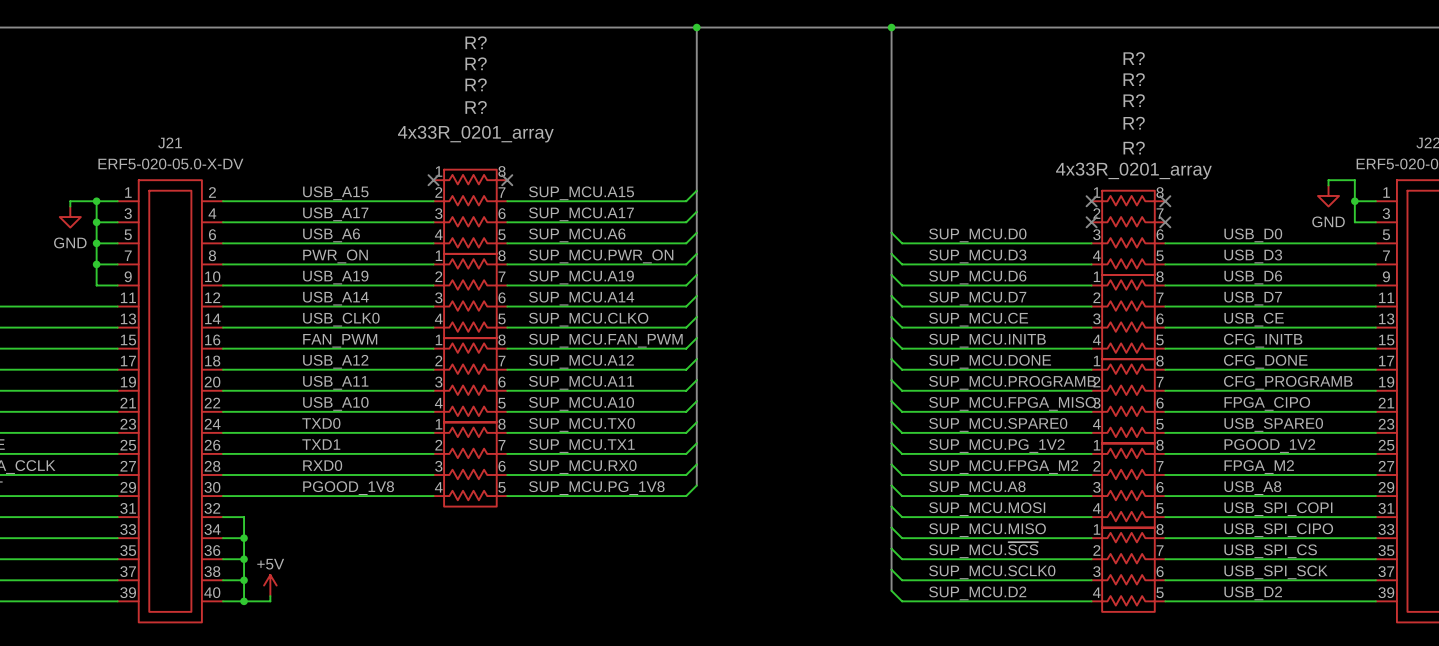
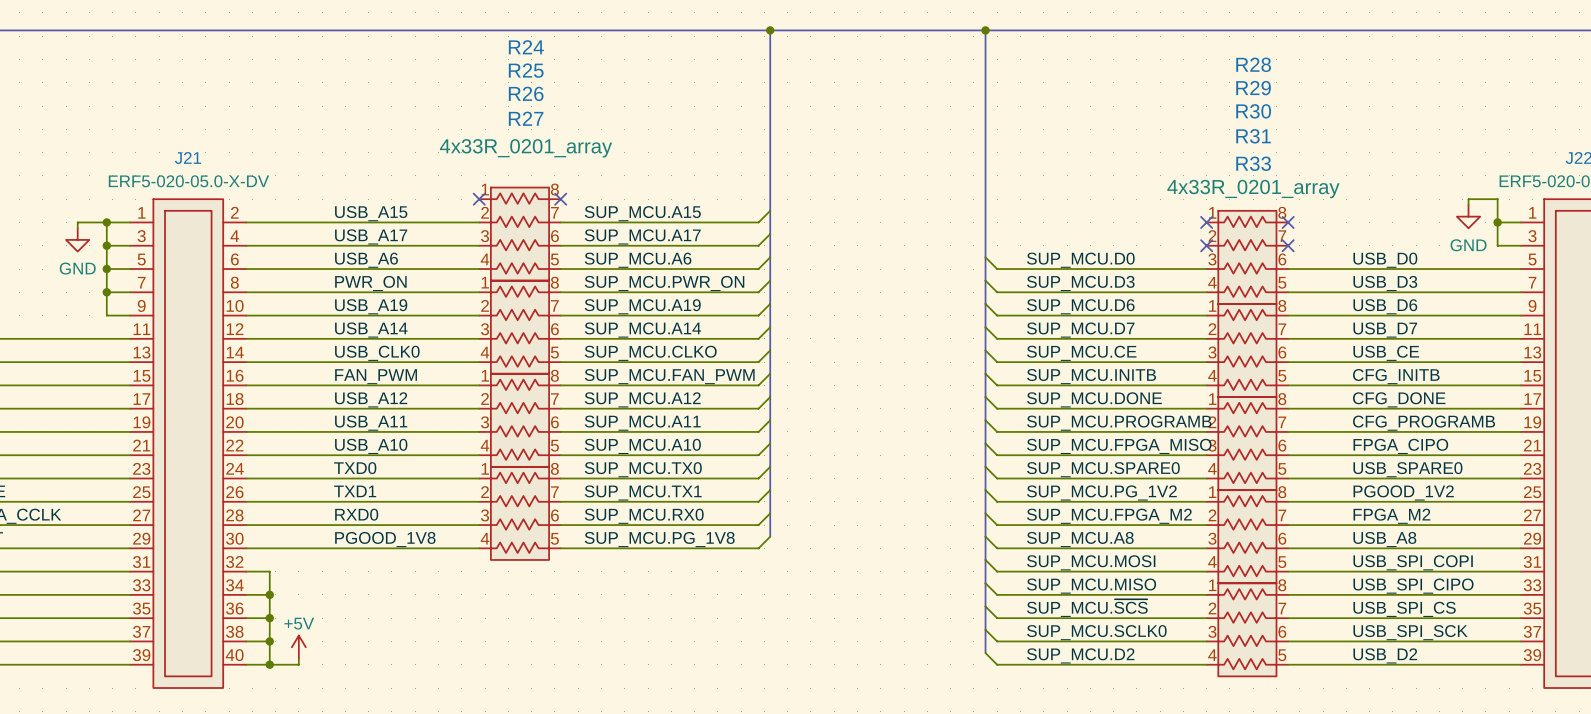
R? name: R? (476, 42) -> R24 (526, 47)
R? name: R? (1134, 58) -> R28 (1253, 64)
R? name: R? (476, 63) -> R25 (526, 70)
R? name: R? (1134, 79) -> R29 (1253, 88)
R? name: R? (476, 84) -> R26 (526, 93)
R? name: R? (1134, 100) -> R30 (1253, 111)
R? name: R? (476, 107) -> R27 (526, 118)
R? name: R? (1134, 123) -> R31 (1253, 136)
R? name: R? (1134, 148) -> R33 (1253, 163)

